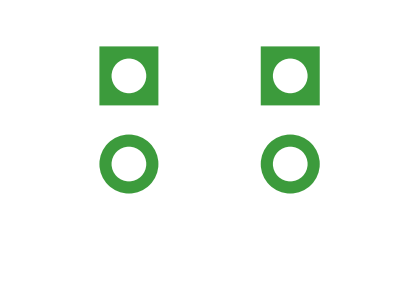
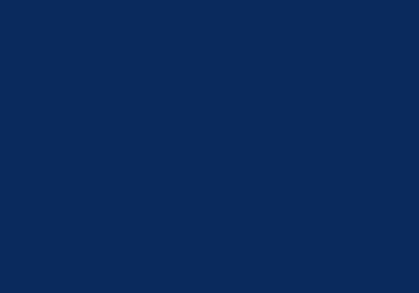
part: (128, 119) -> none
part: (290, 119) -> none

